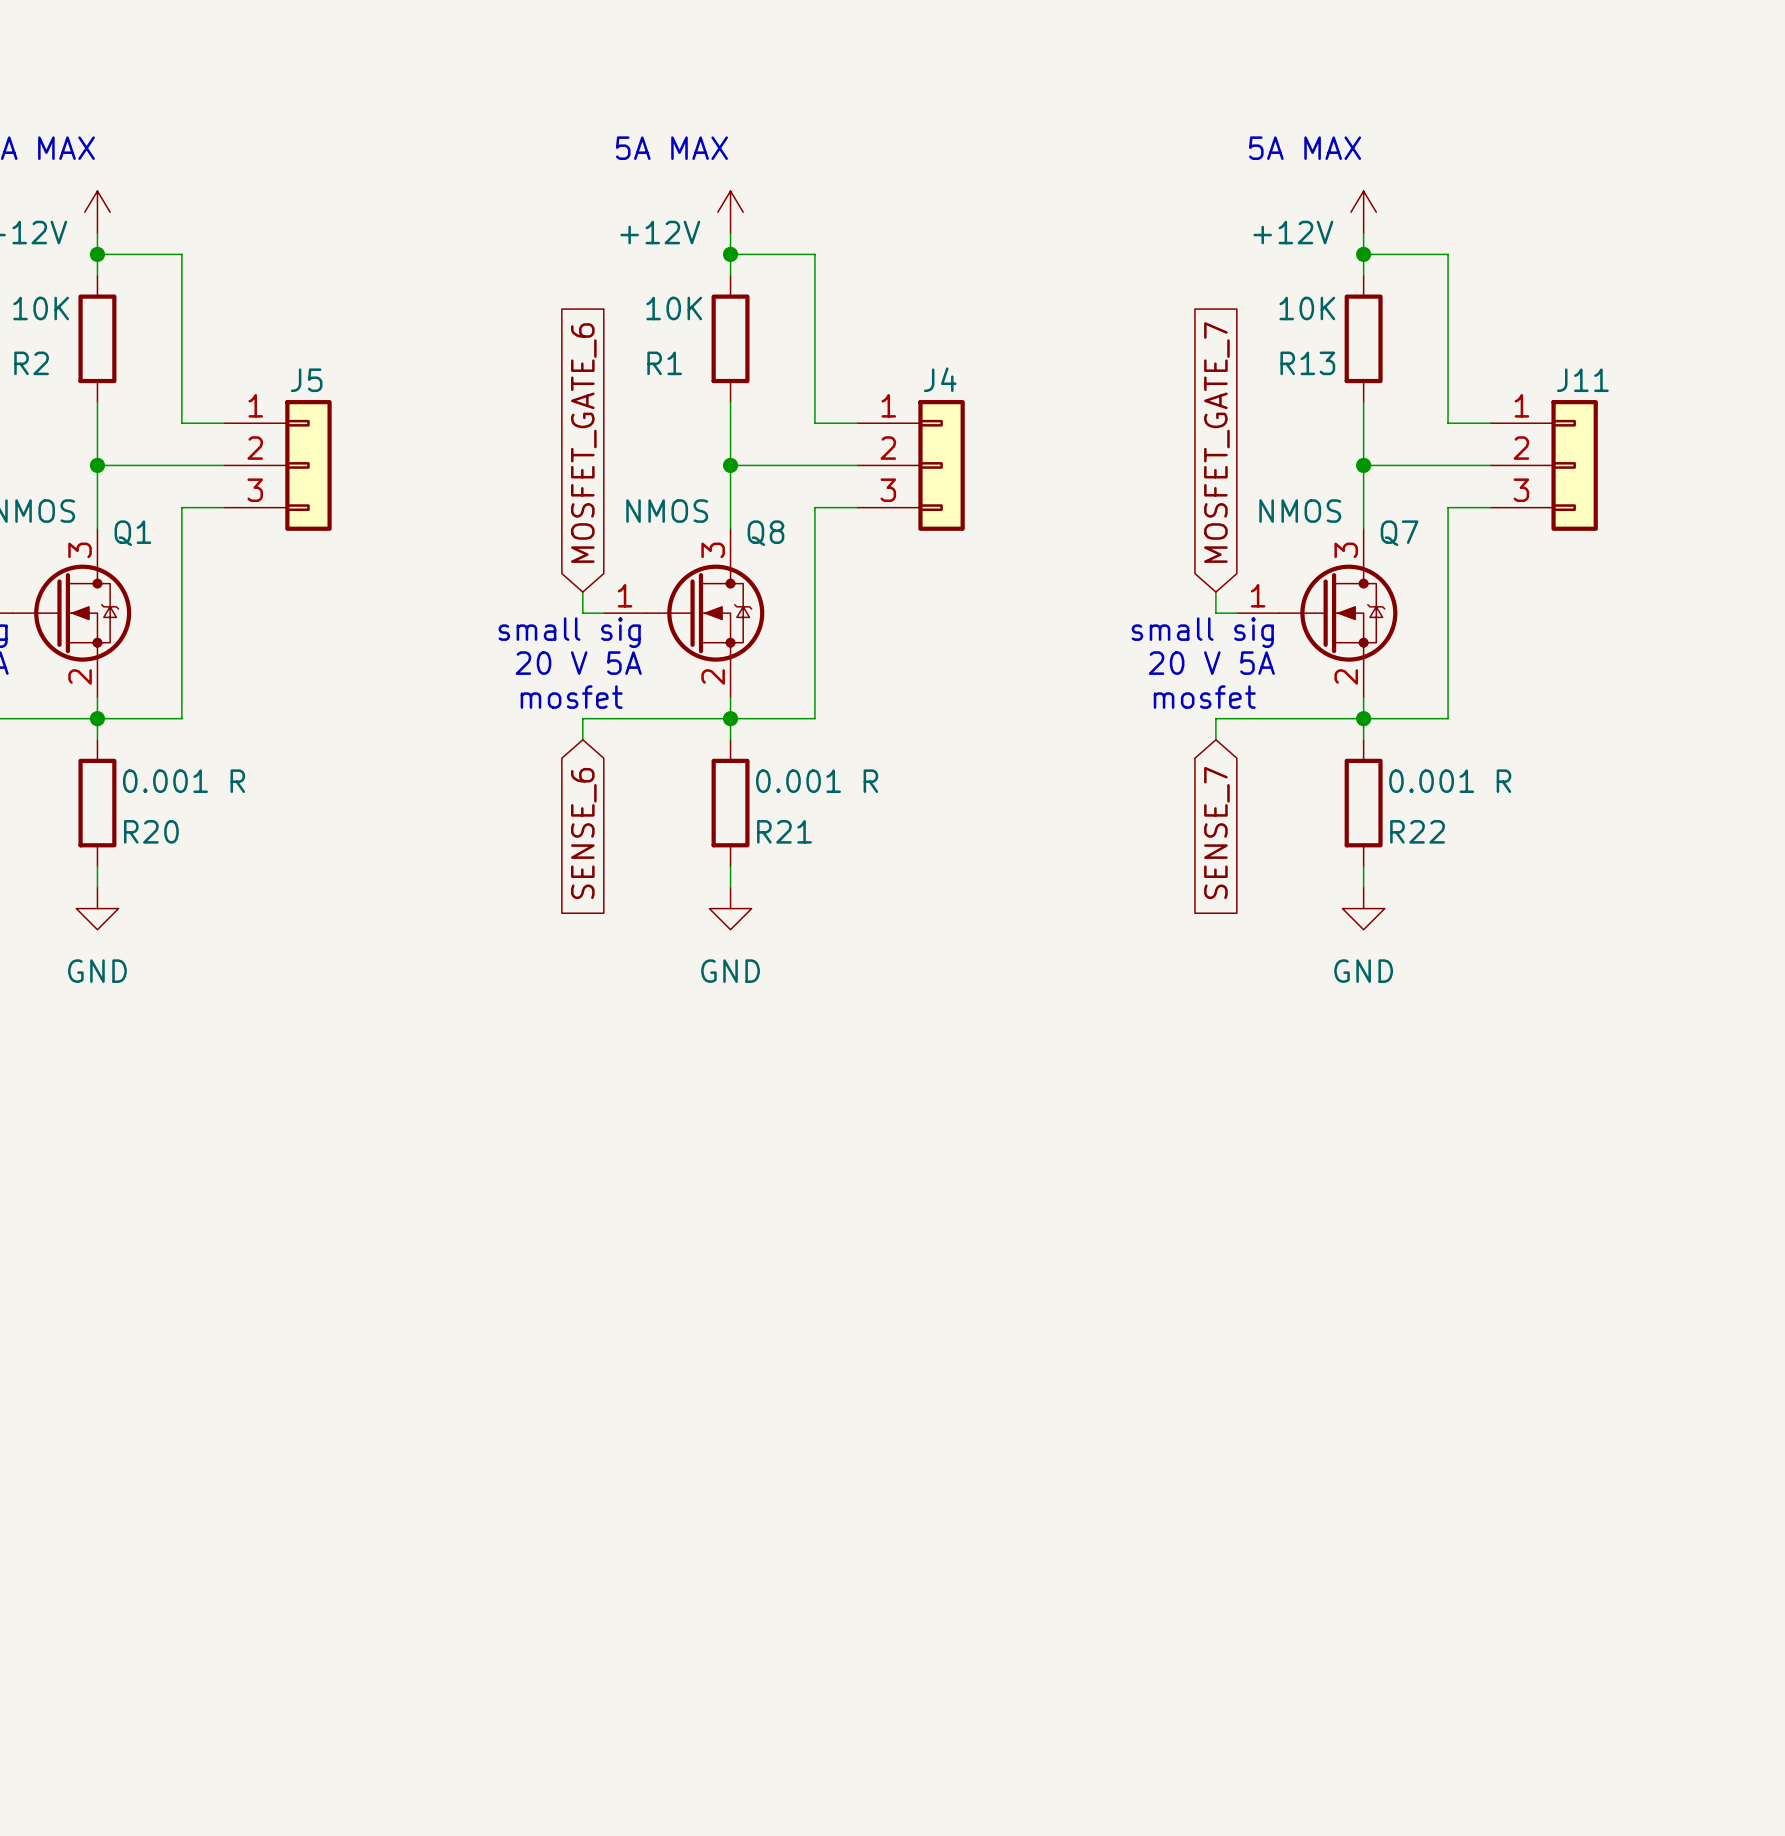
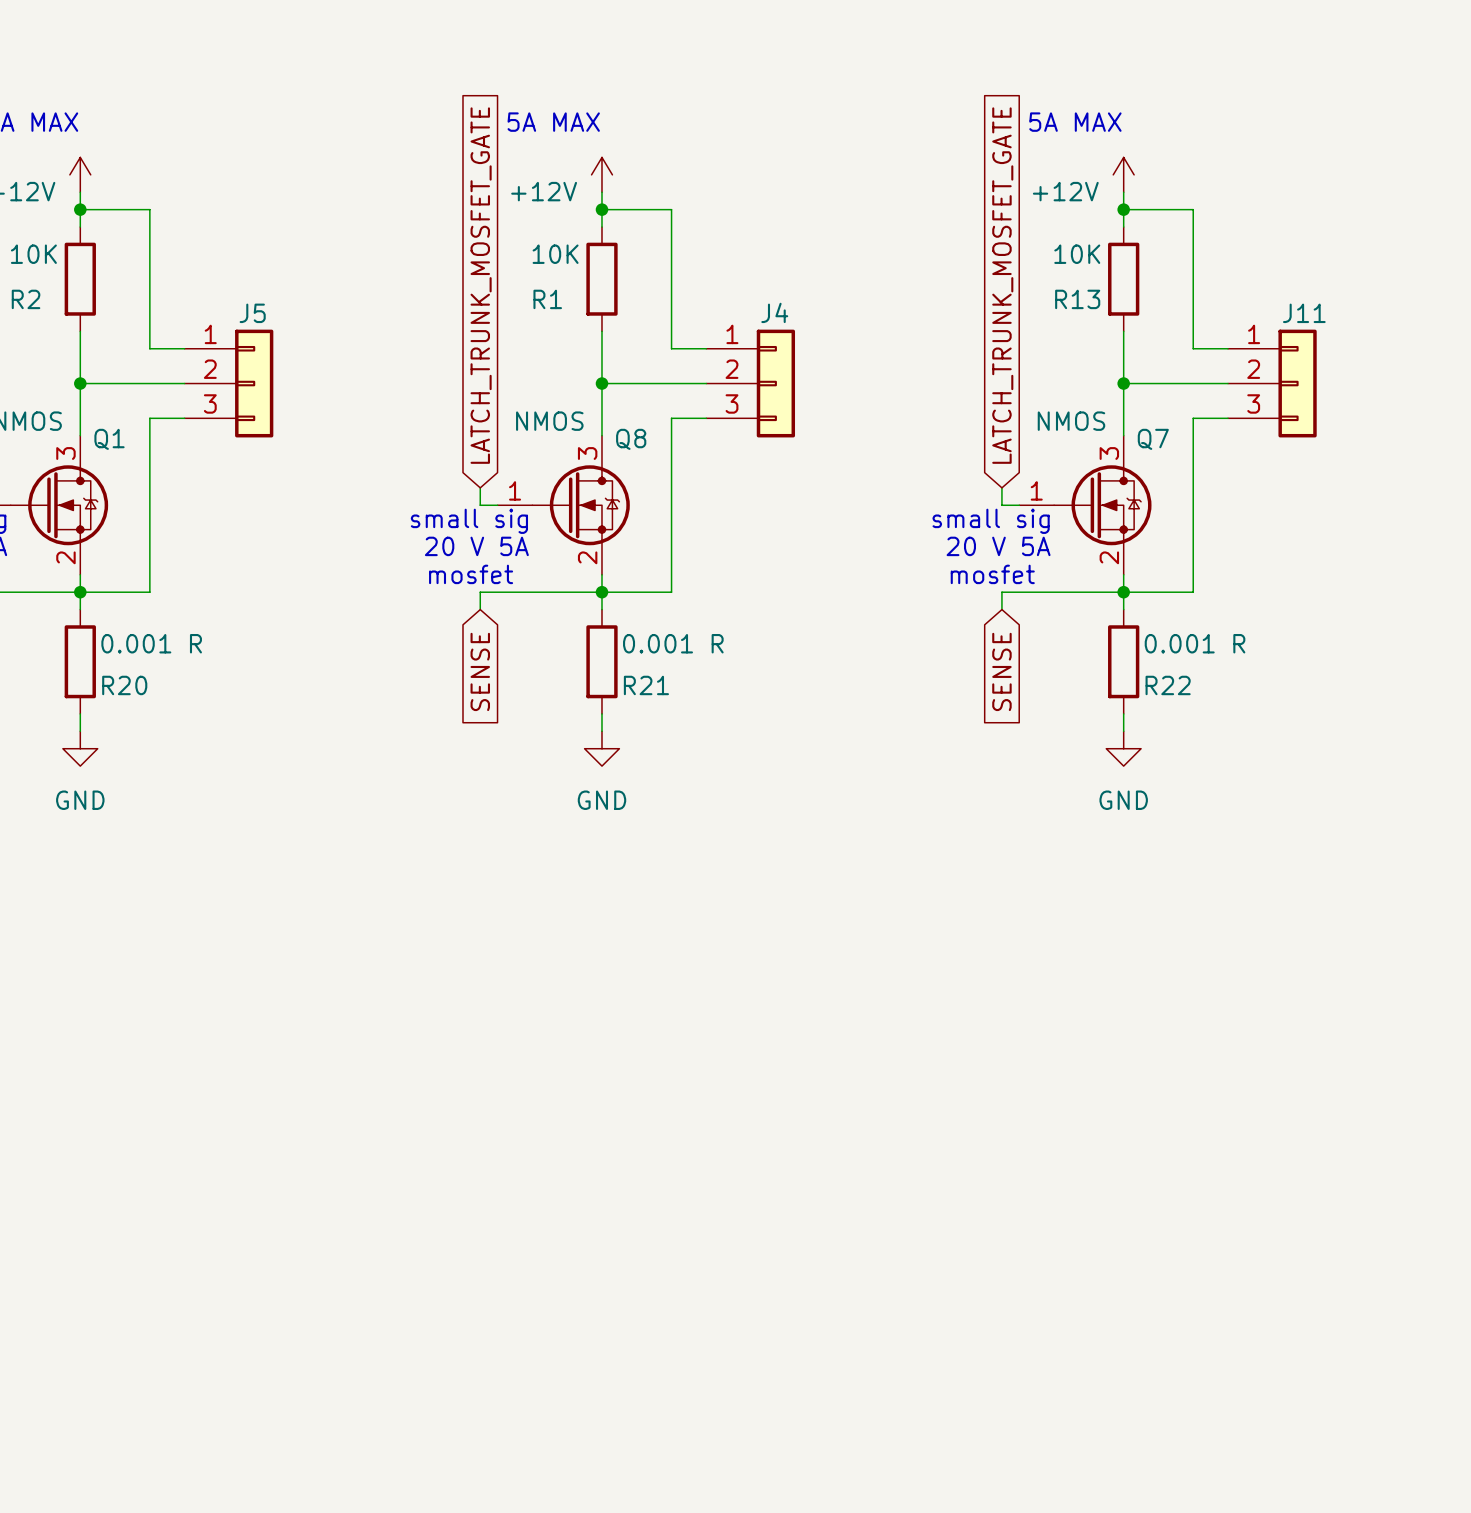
global label: MOSFET_GATE_7 (1216, 442) -> LATCH_TRUNK_MOSFET_GATE (1002, 285)
global label: MOSFET_GATE_6 (583, 443) -> LATCH_TRUNK_MOSFET_GATE (481, 285)
global label: SENSE_6 (583, 833) -> SENSE (480, 671)
global label: SENSE_7 (1216, 833) -> SENSE (1001, 671)

